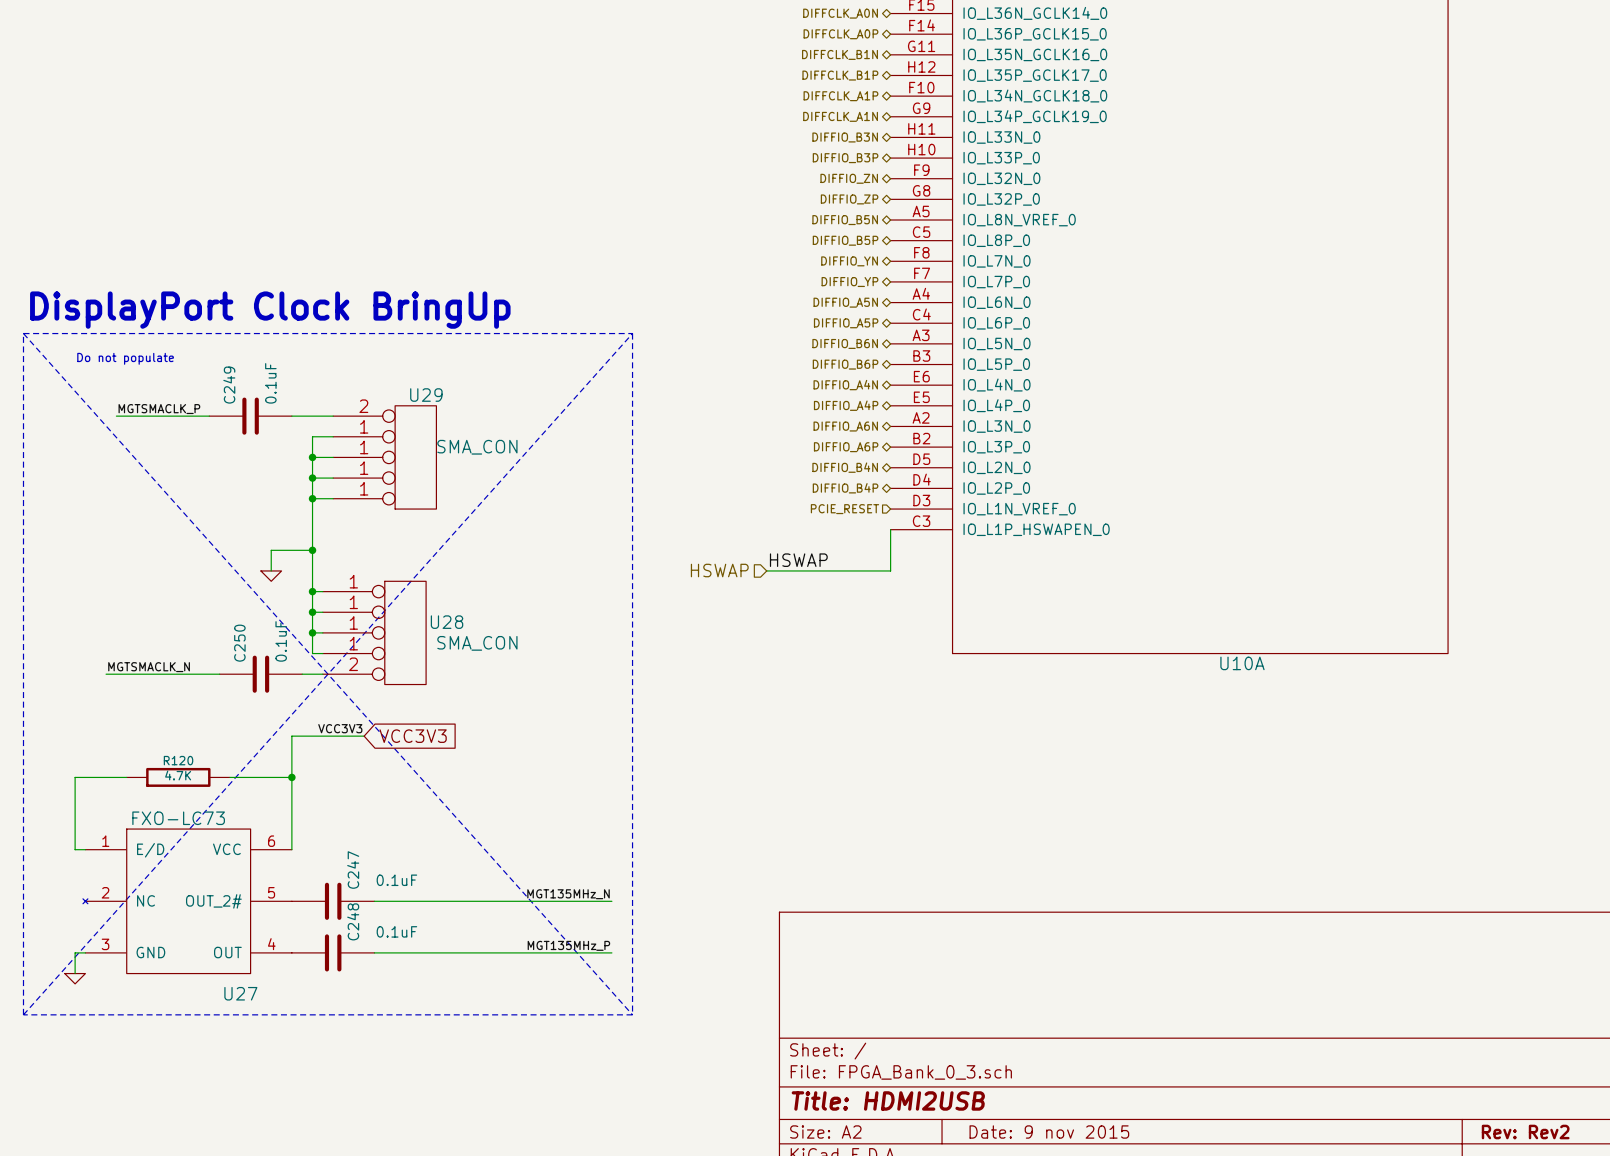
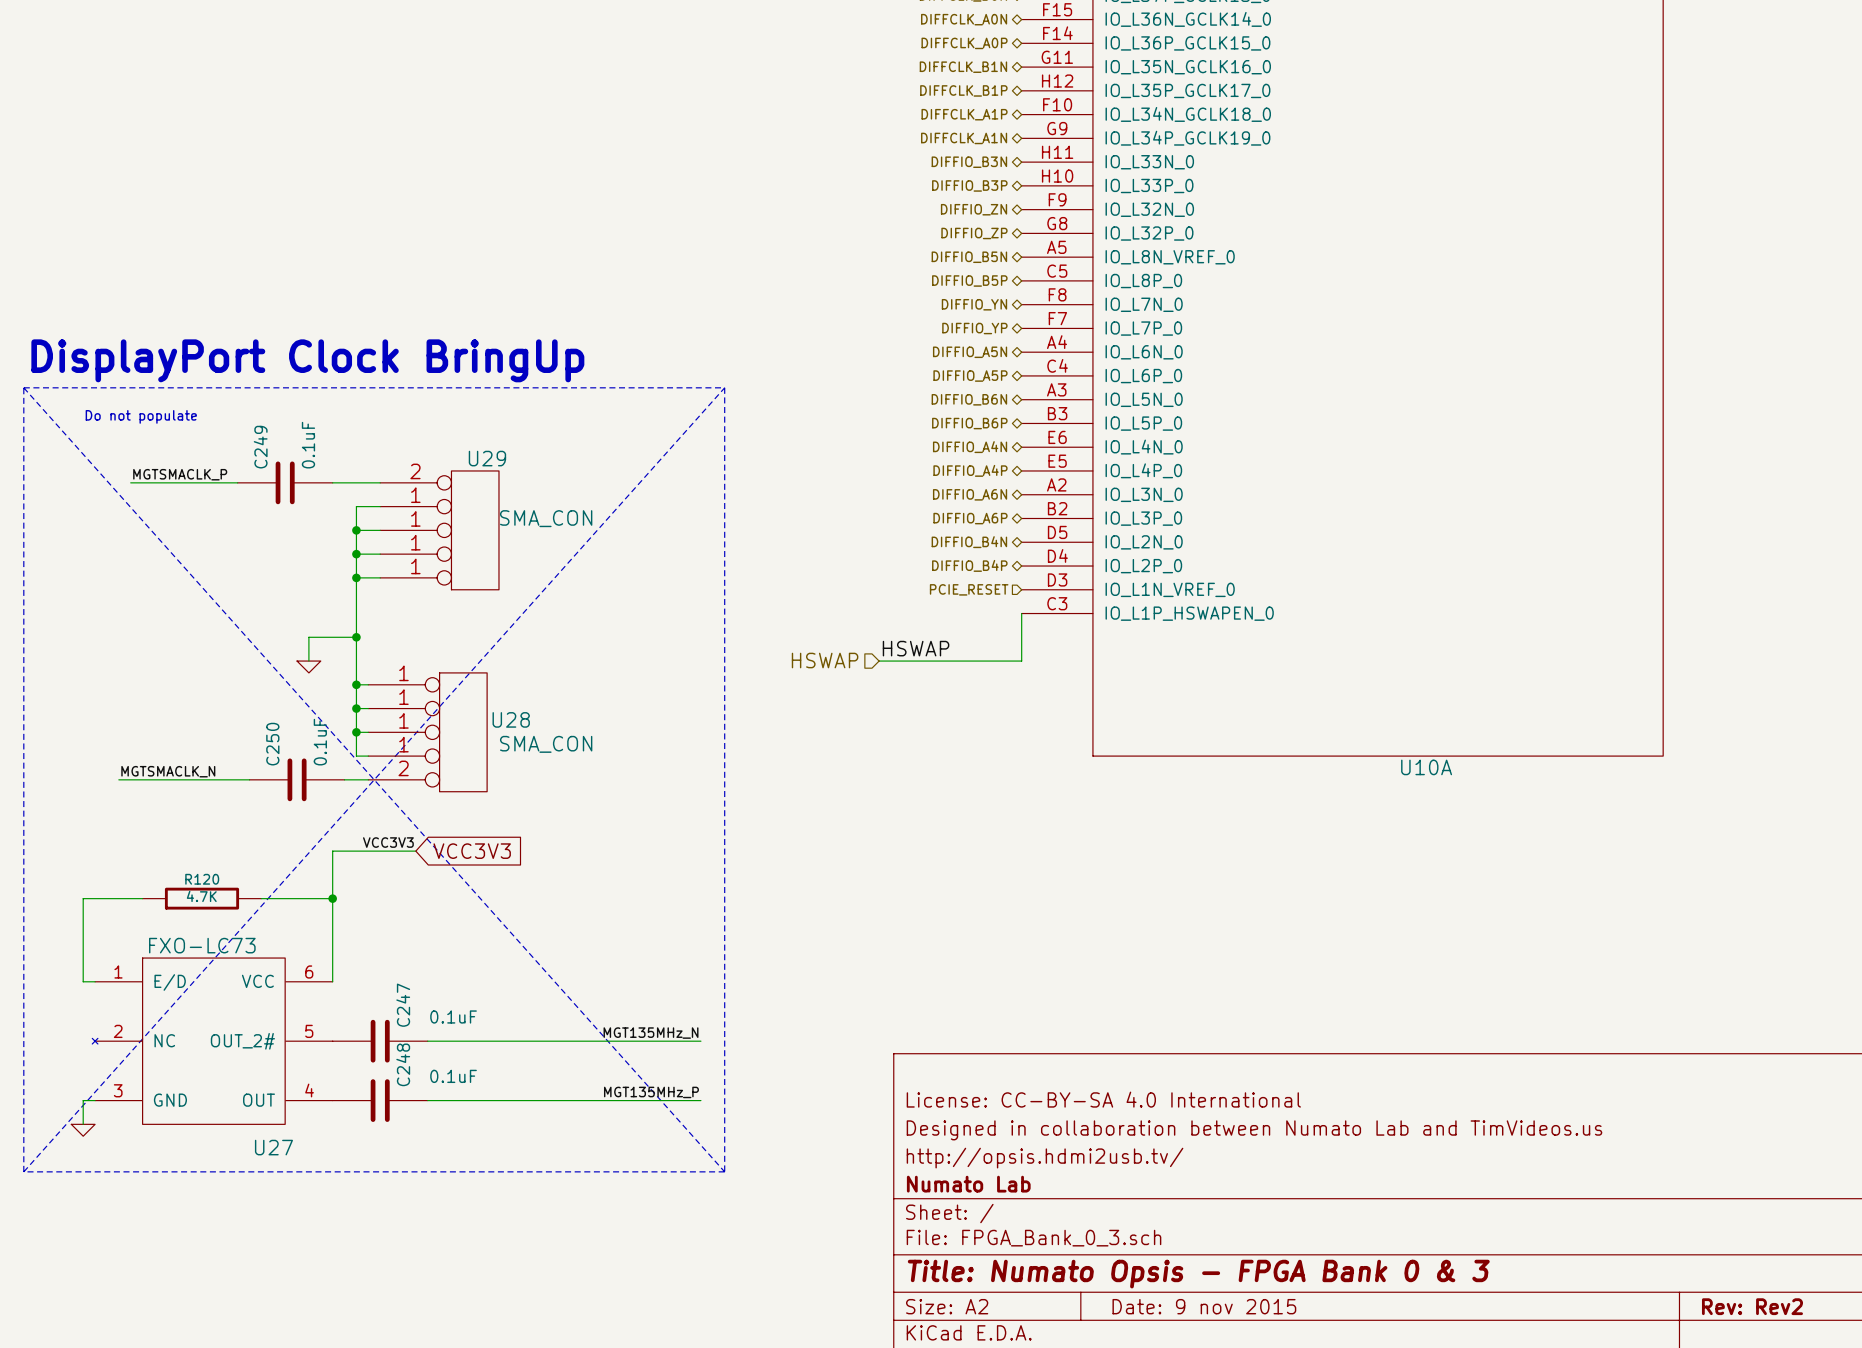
title block: none -> License: CC-BY-SA 4.0 International (1103, 1099)
title block: none -> Designed in collaboration between Numato Lab and TimVideos.us (1254, 1130)
title block: none -> http://opsis.hdmi2usb.tv/ (1045, 1158)
title block: none -> Numato Lab (968, 1184)
title block: Title: HDMI2USB (888, 1100) -> Title: Numato Opsis - FPGA Bank 0 & 3 (1198, 1274)

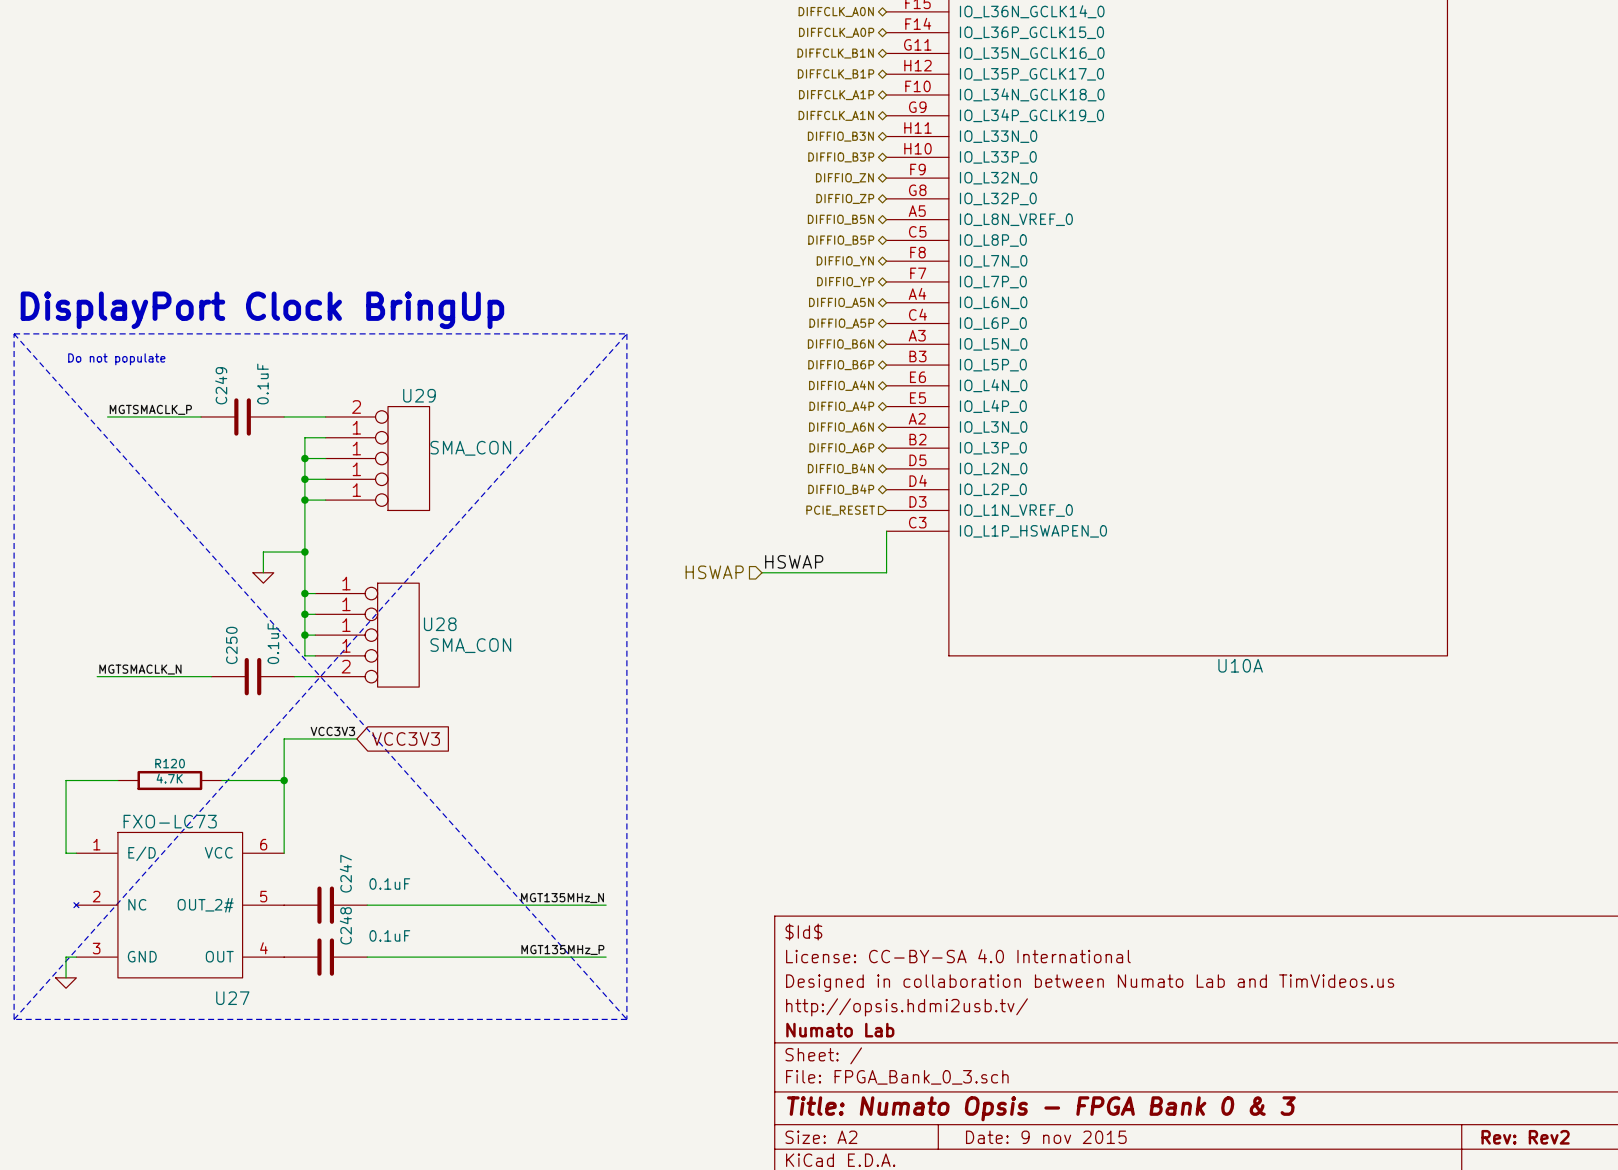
title block: none -> $Id$ (803, 932)

